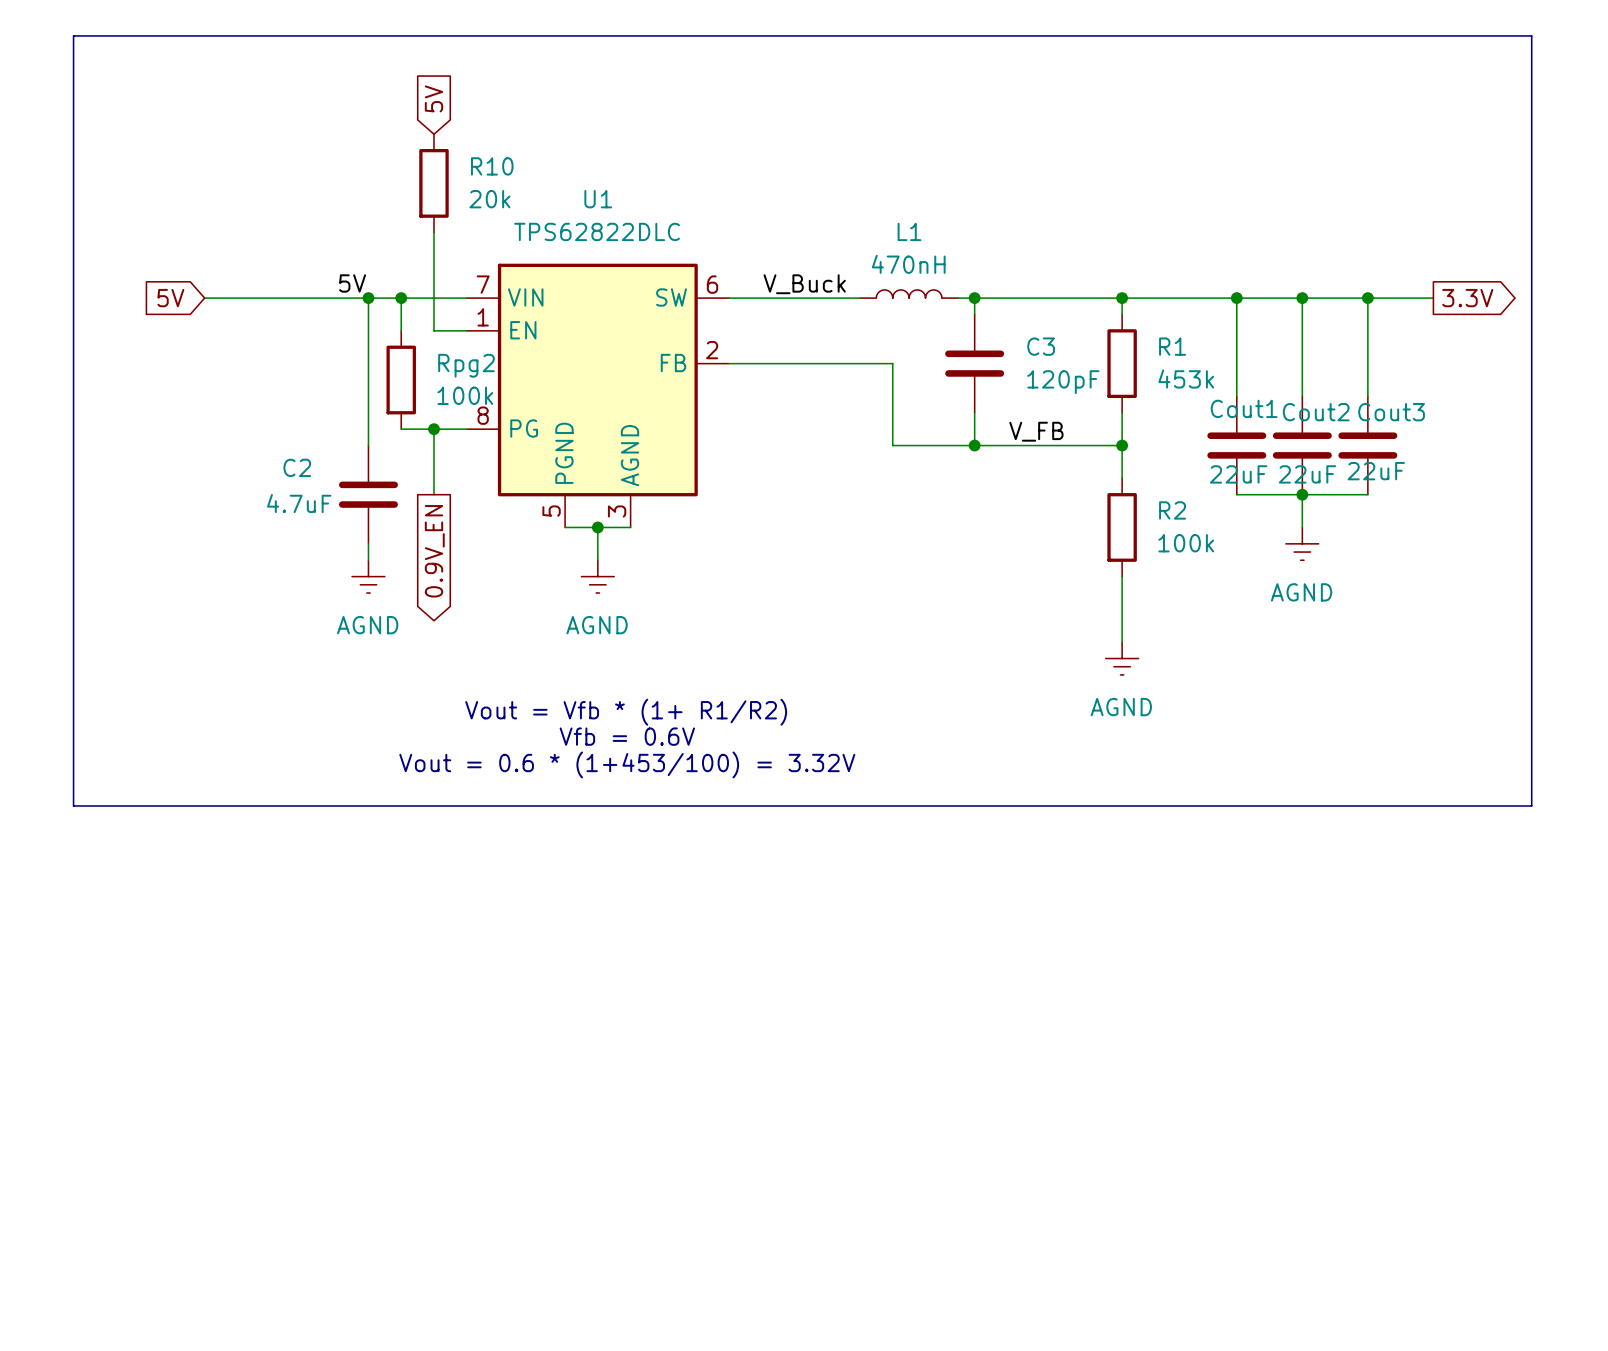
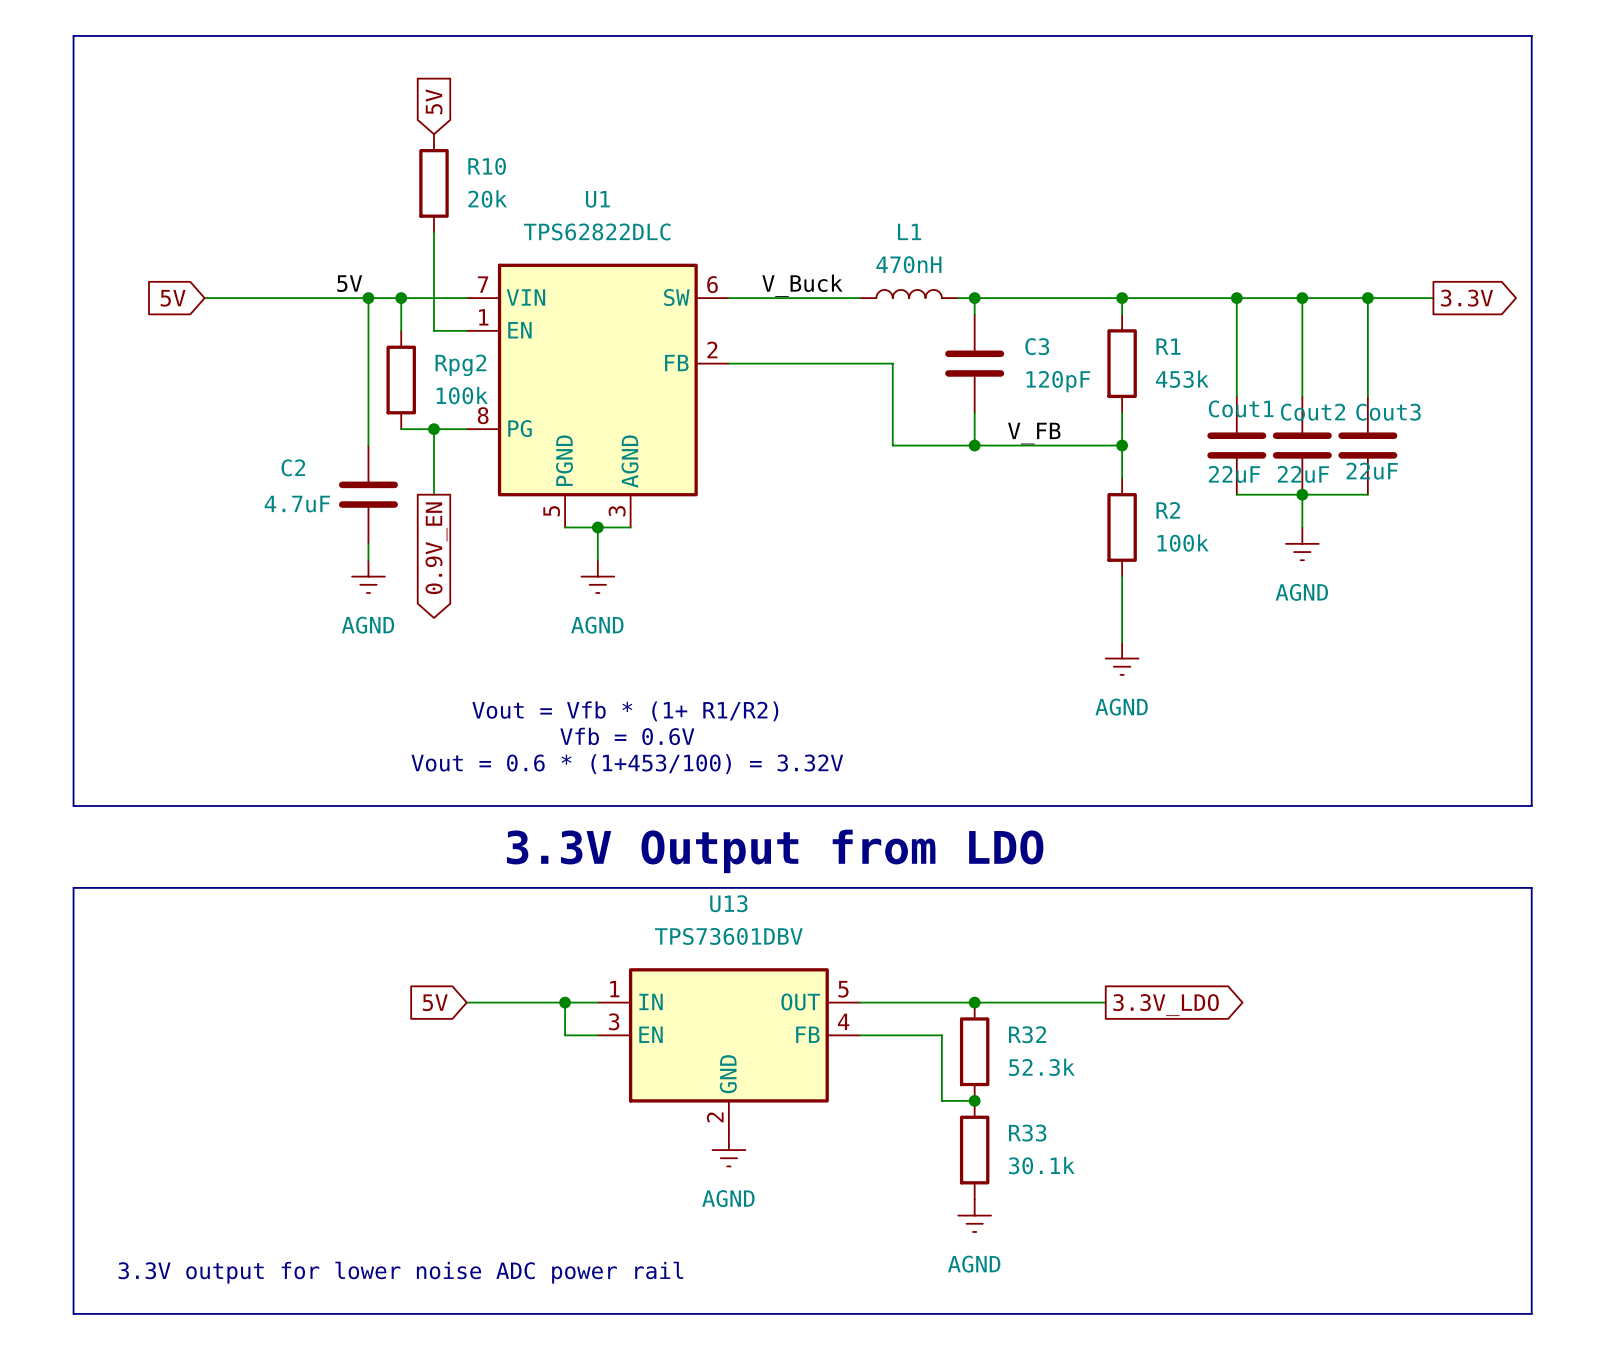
text: none -> 3.3V Output from LDO (775, 851)
line: none -> (73, 887) (1531, 887) (1531, 1313) (73, 1313) (73, 887)
global label: none -> 5V (435, 1002)
wire: none -> (466, 1002) (597, 1002)
wire: none -> (565, 1002) (565, 1035) (597, 1035)
junction: none -> (565, 1002)
wire: none -> (859, 1002) (1105, 1002)
junction: none -> (974, 1002)
global label: none -> 3.3V_LDO (1166, 1005)
wire: none -> (859, 1035) (941, 1035) (941, 1100) (974, 1100)
U13: none -> TPS73601DBV (728, 1050)
R32: none -> 52.3k (974, 1051)
junction: none -> (974, 1100)
power symbol: none -> AGND (728, 1150)
R33: none -> 30.1k (974, 1150)
power symbol: none -> AGND (974, 1215)
text: none -> 3.3V output for lower noise ADC power rail (400, 1272)

